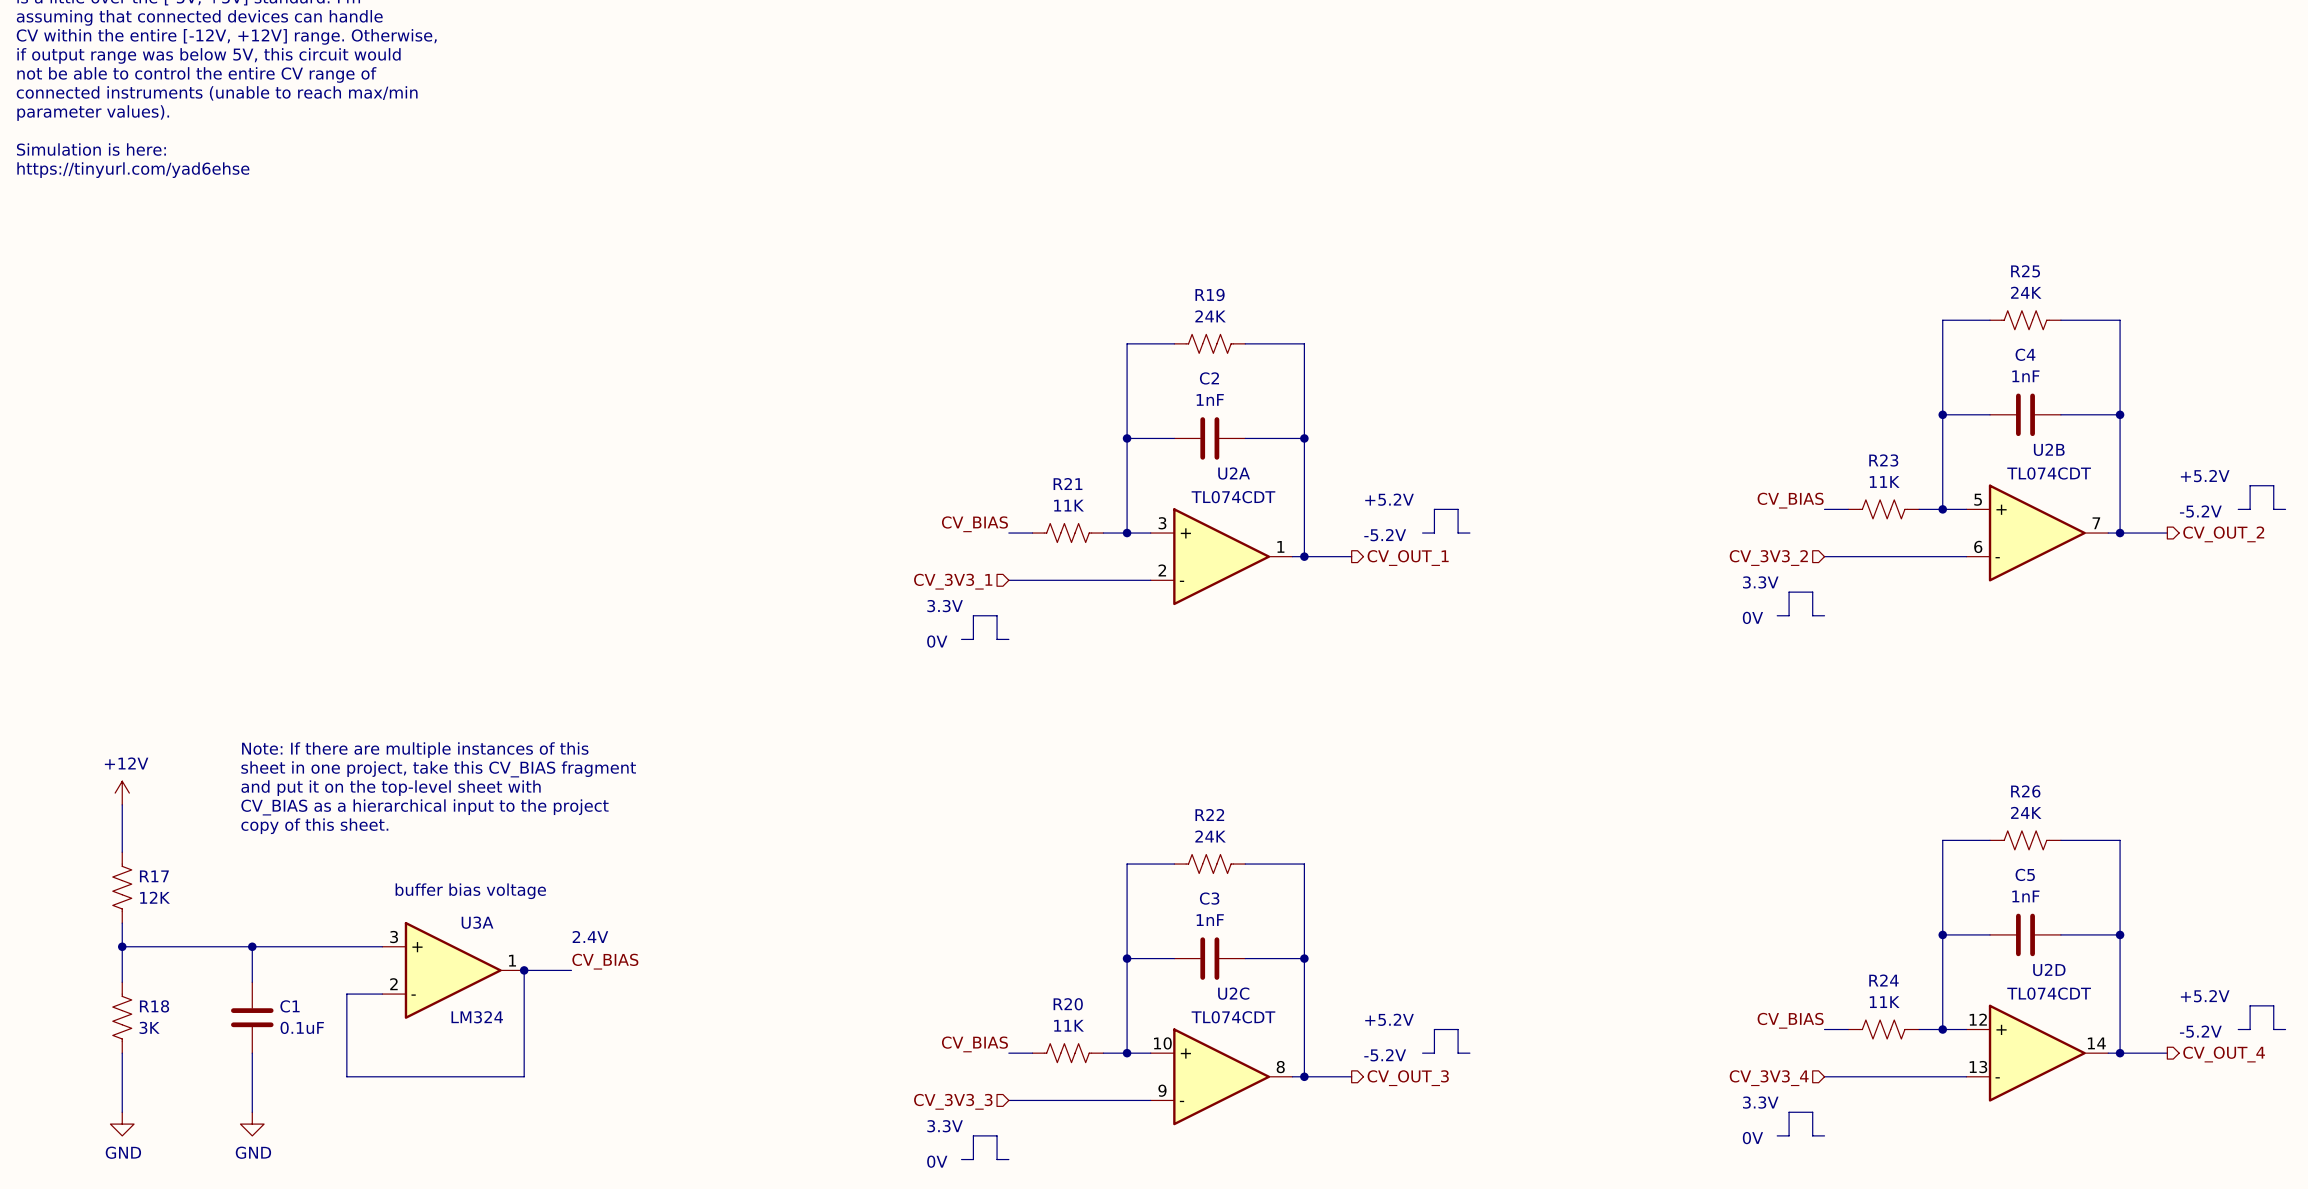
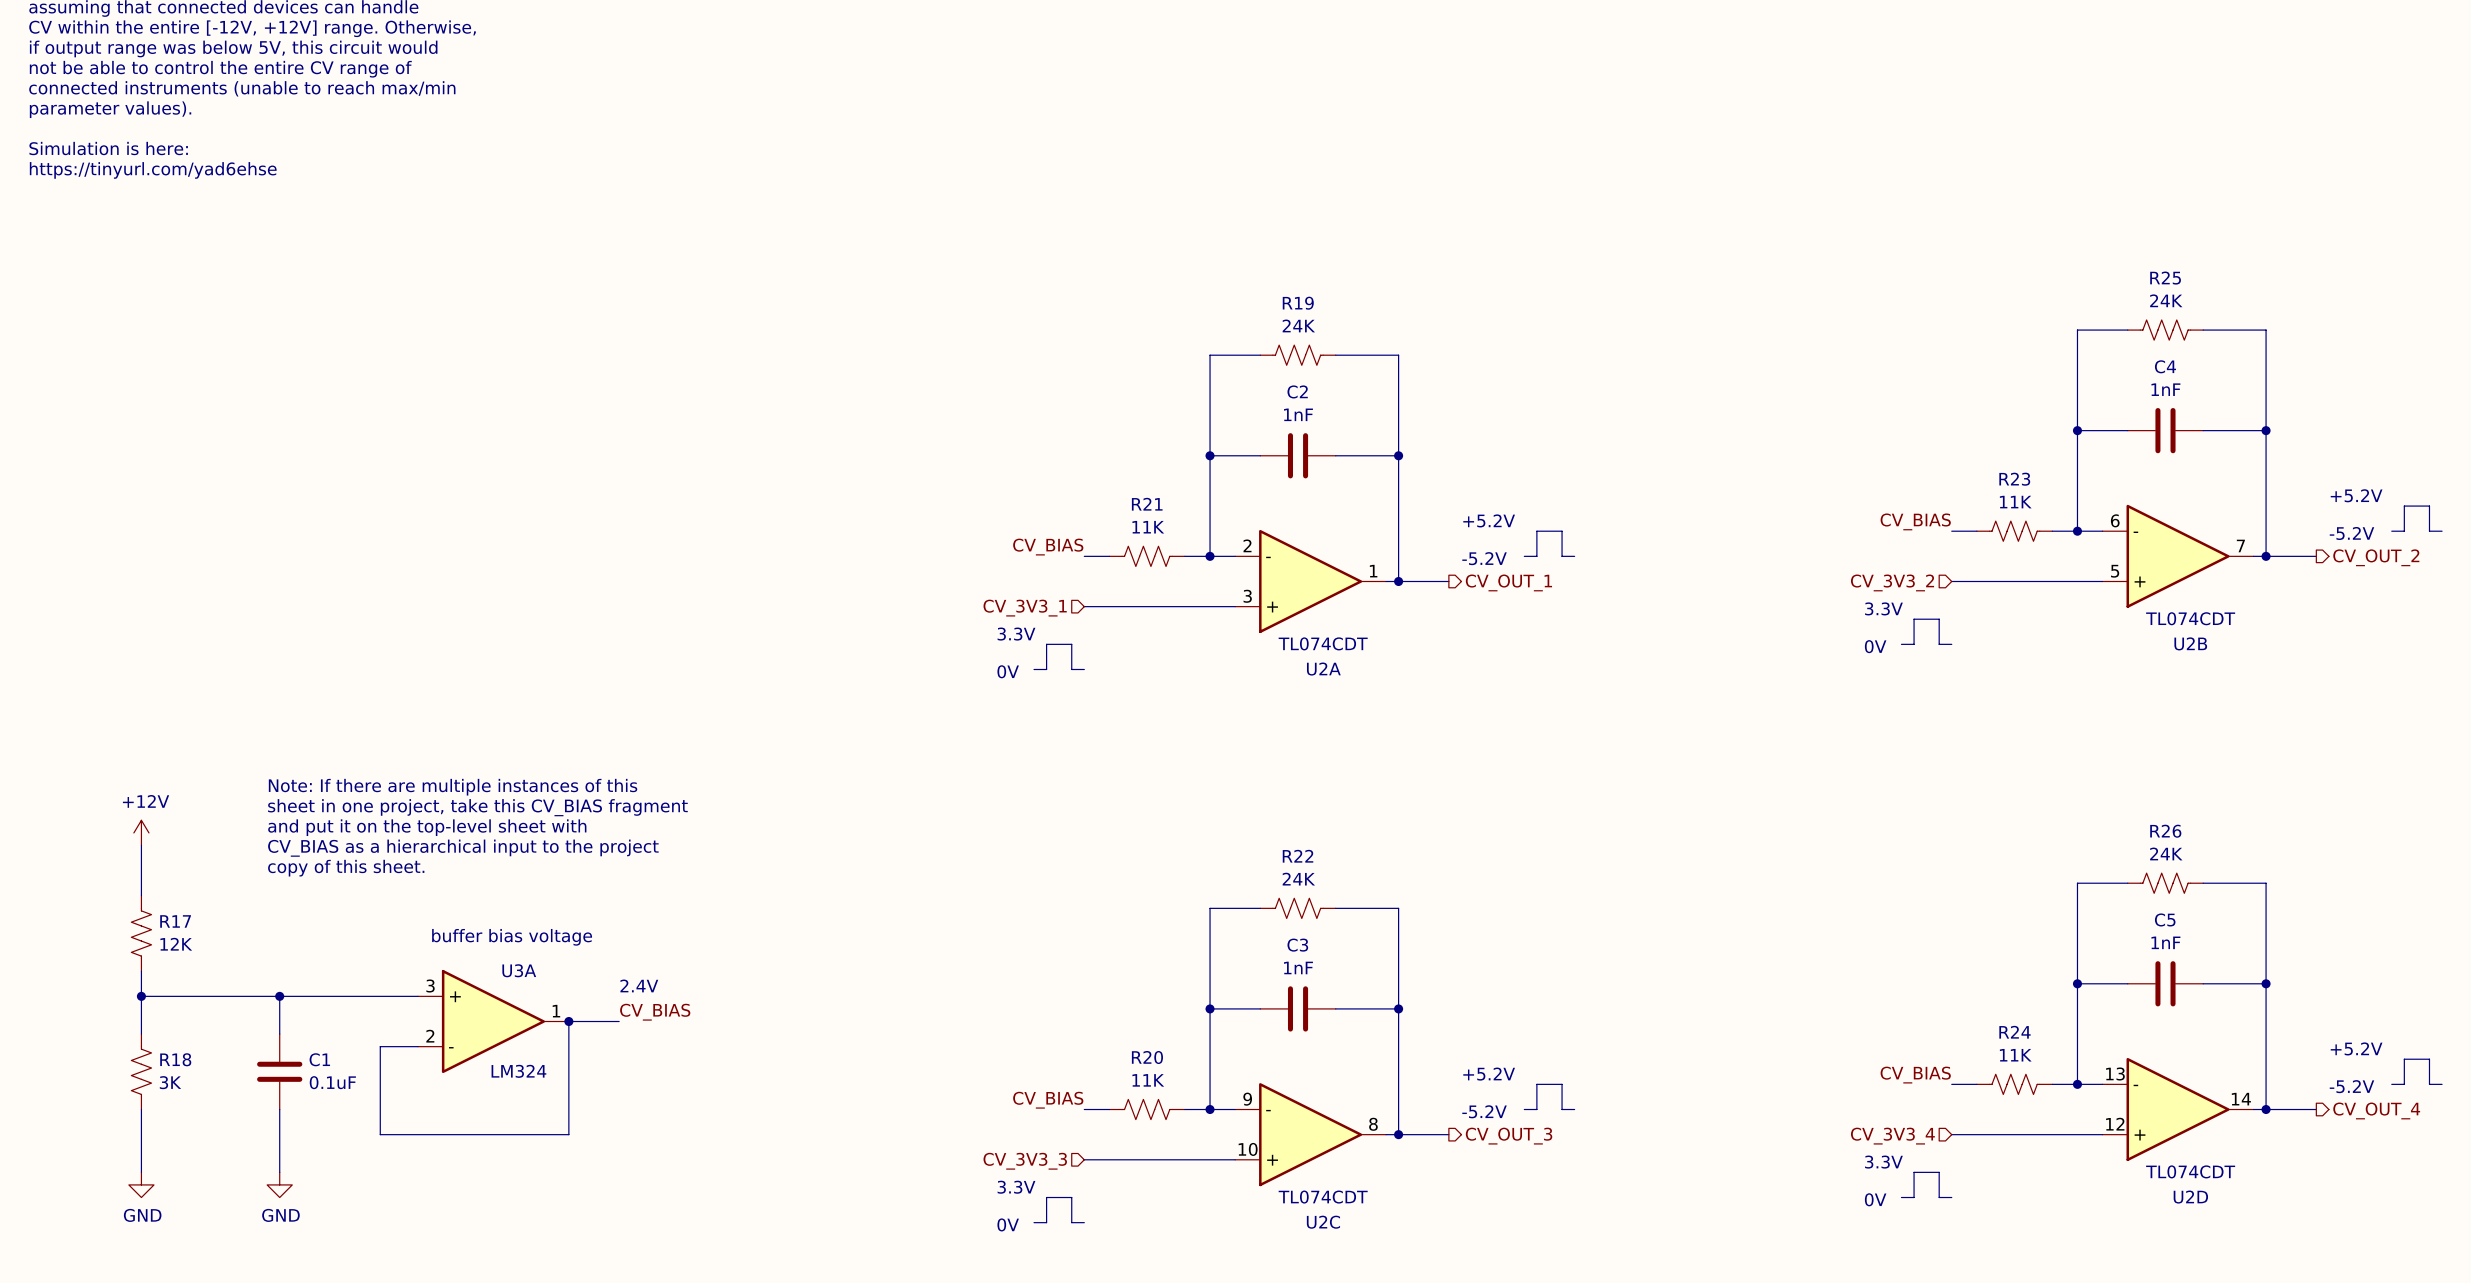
U2B flip: as is (2037, 533) -> up-down (2178, 556)
U2A flip: as is (1221, 556) -> up-down (1310, 581)
U2D flip: as is (2037, 1053) -> up-down (2178, 1109)
U2C flip: as is (1221, 1076) -> up-down (1310, 1134)

